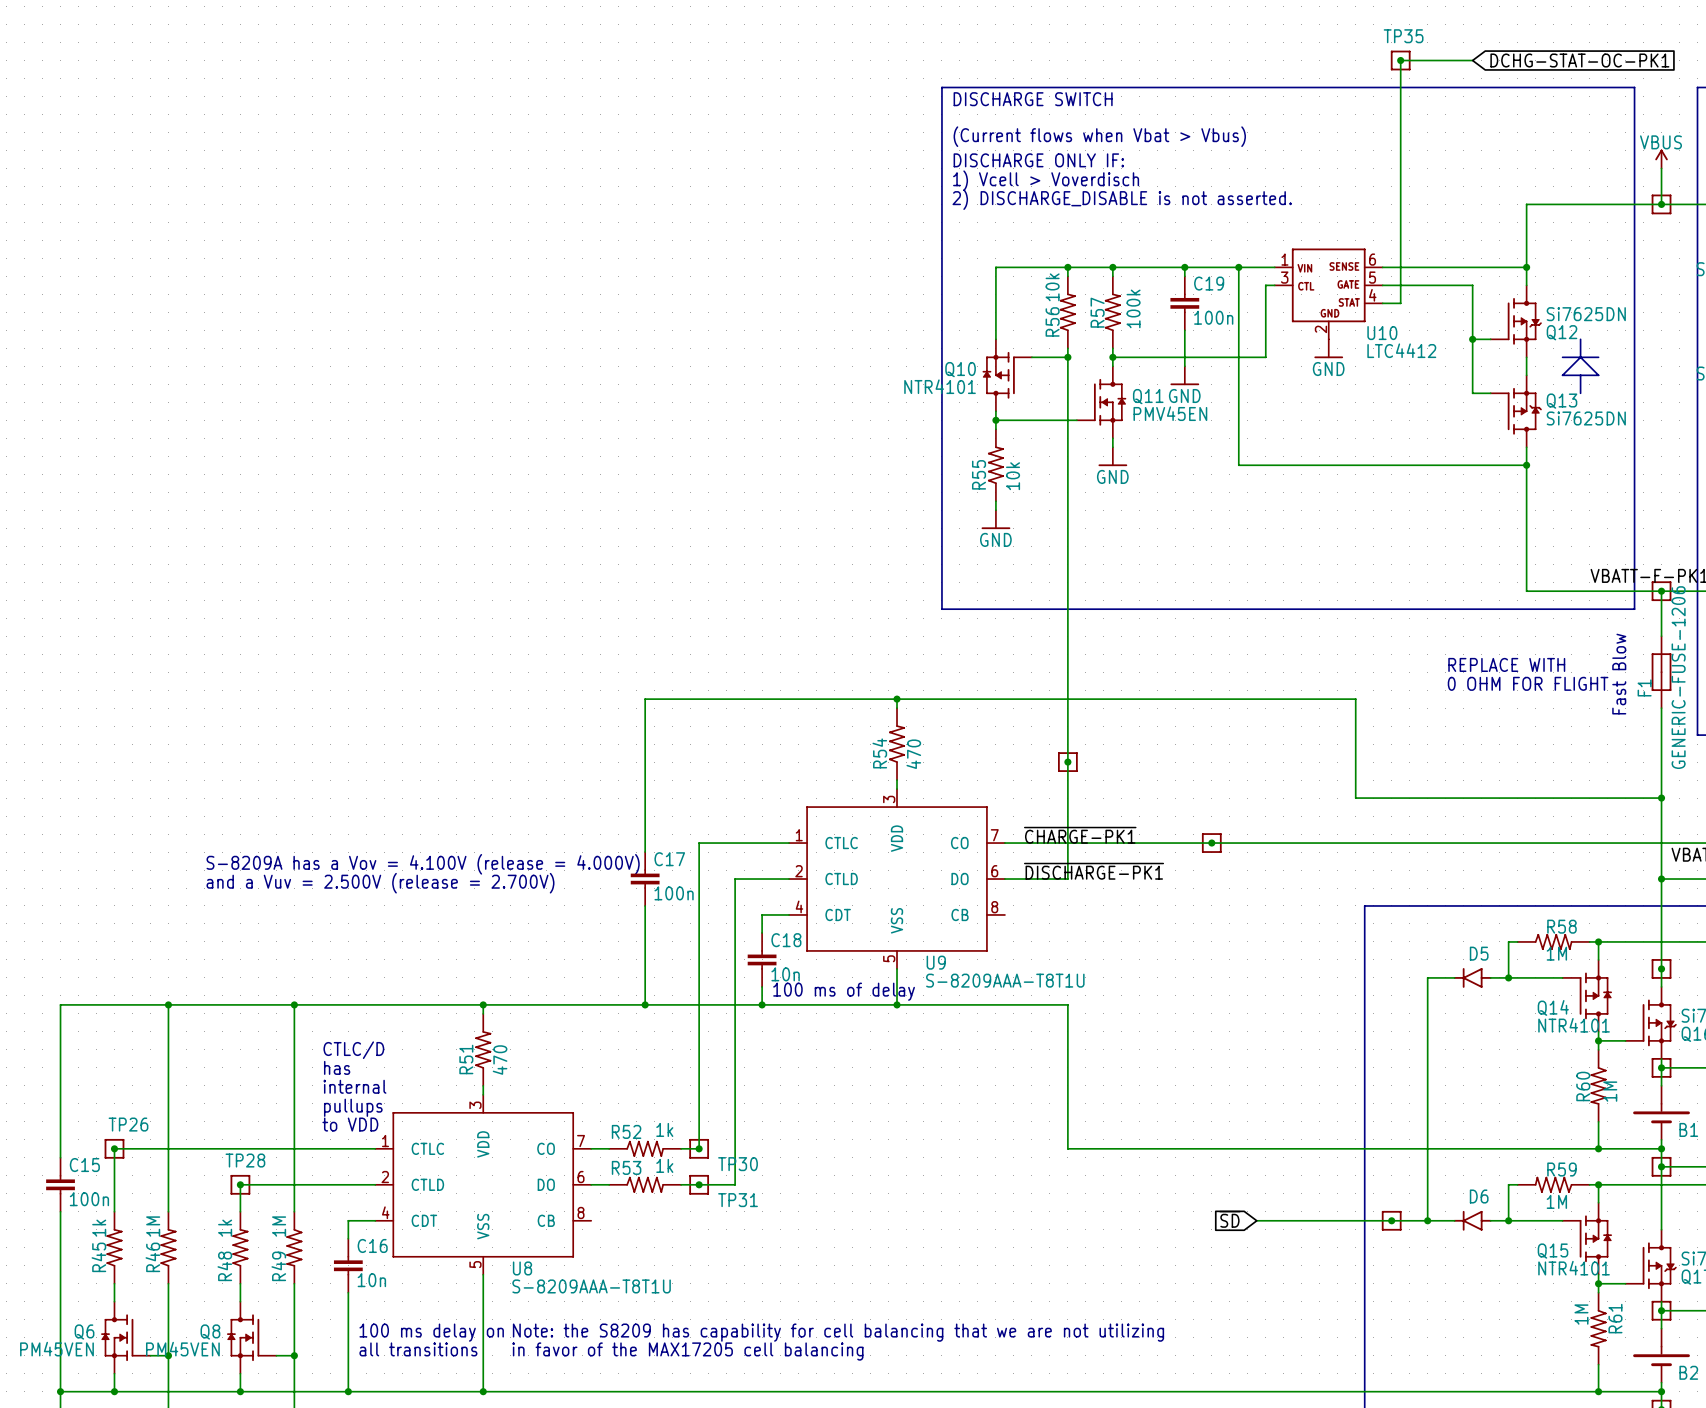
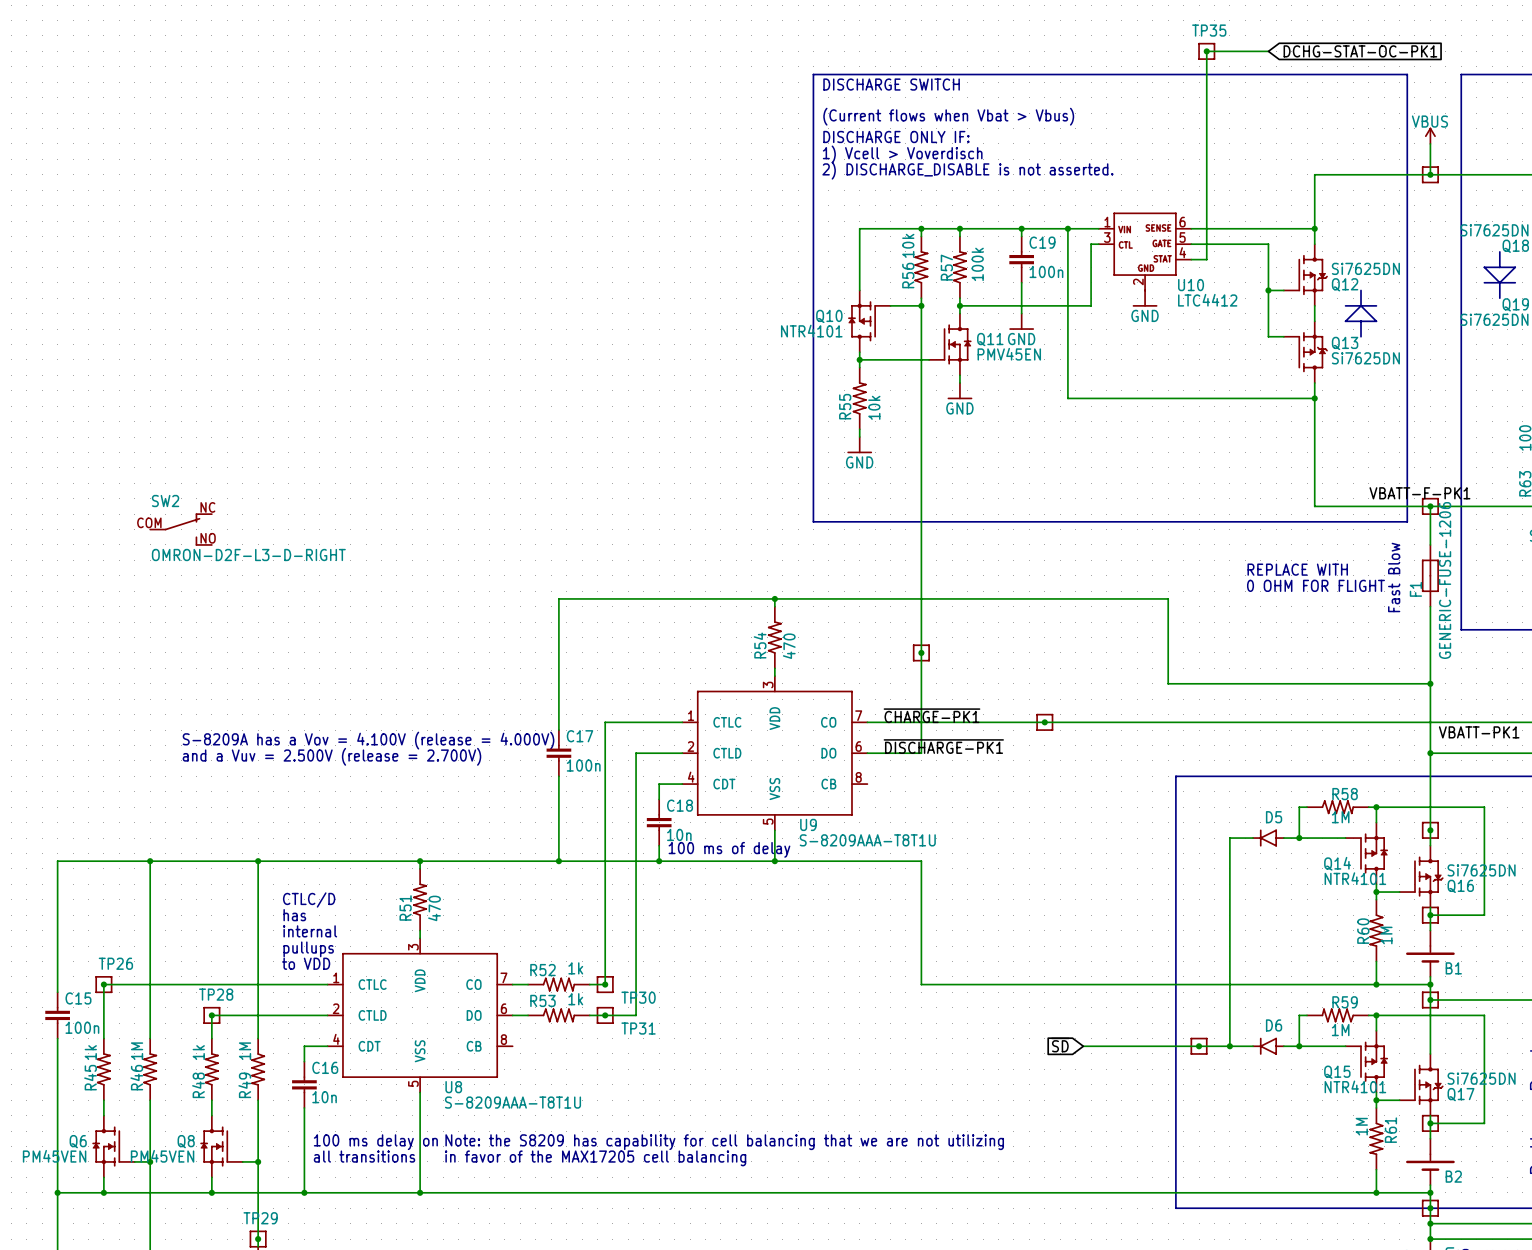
SW2: none -> OMRON-D2F-L3-D-RIGHT (181, 529)

